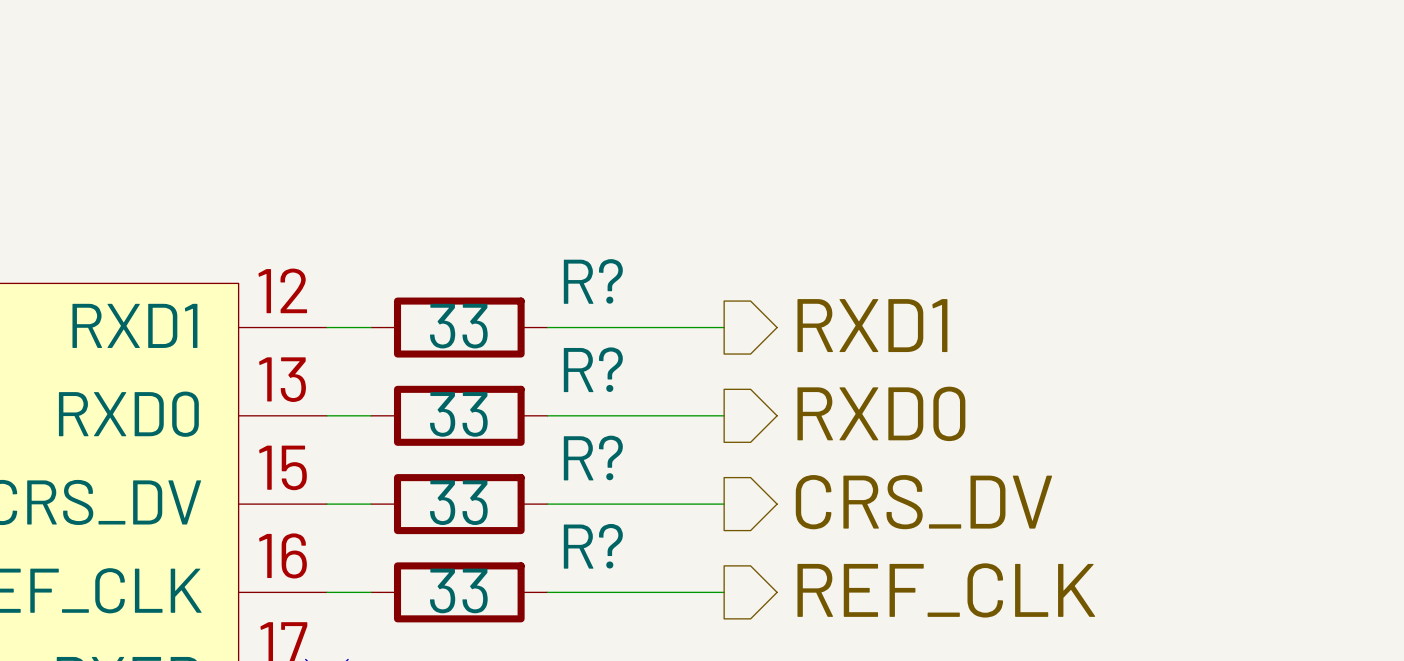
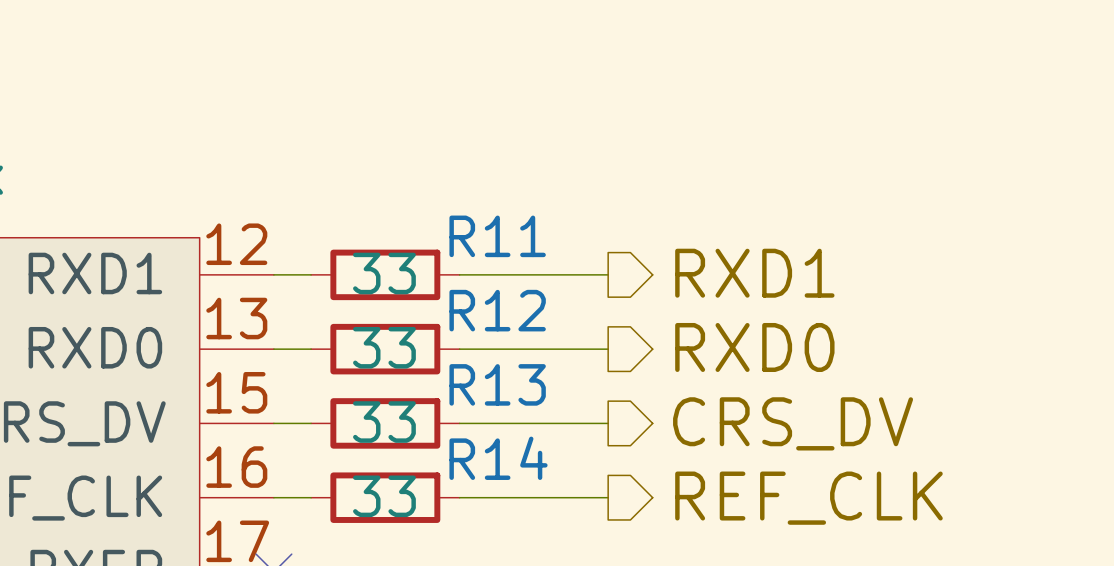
R? name: R? (593, 281) -> R11 (497, 236)
R? name: R? (593, 369) -> R12 (497, 310)
R? name: R? (593, 458) -> R13 (497, 384)
R? name: R? (593, 546) -> R14 (498, 458)

